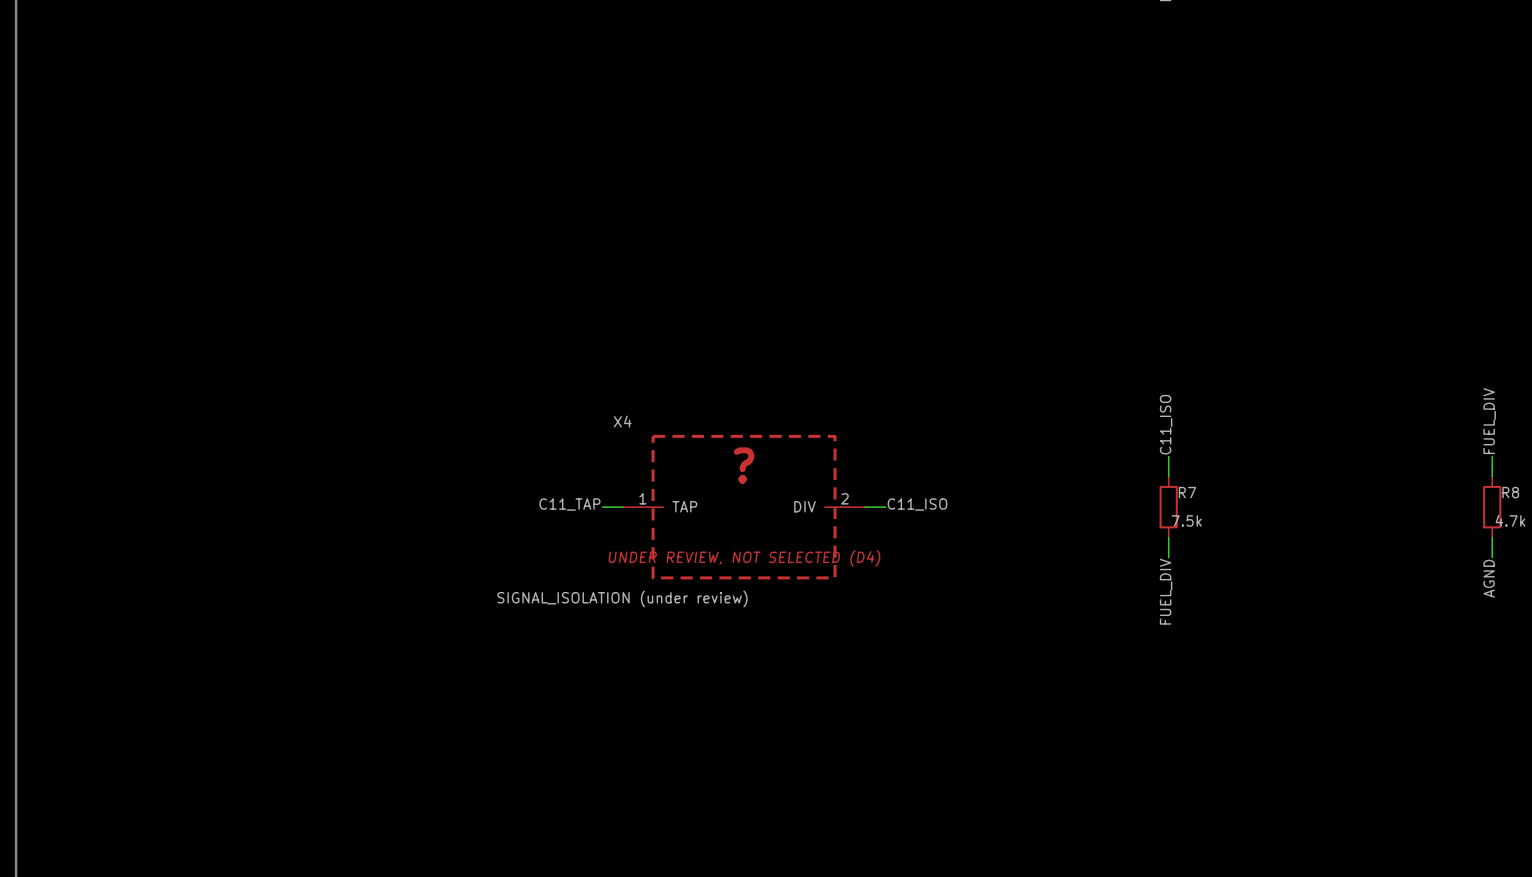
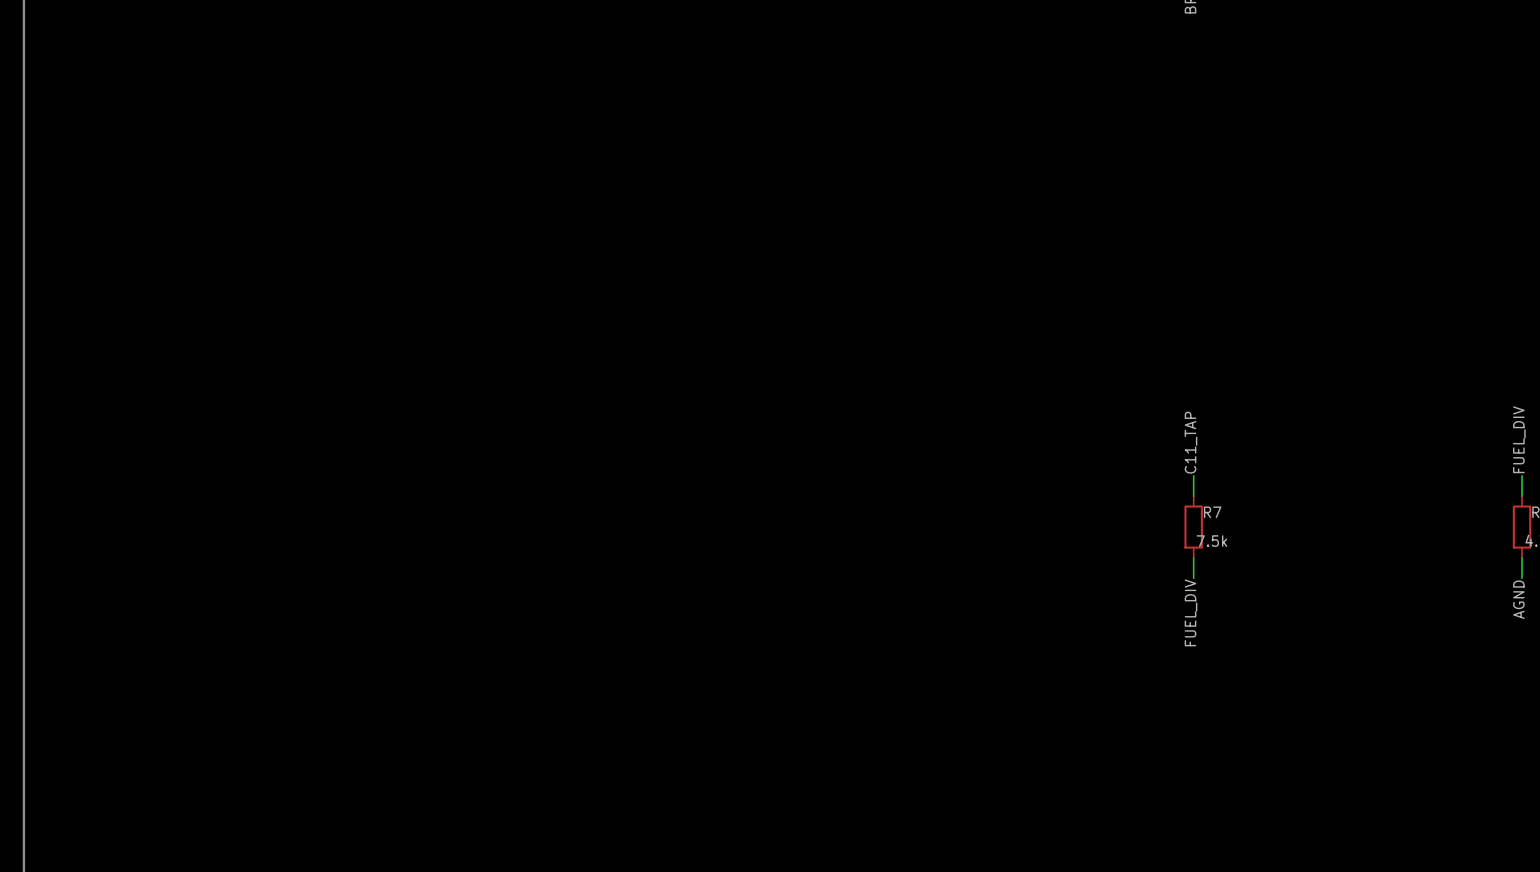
label: C11_ISO (1166, 424) -> C11_TAP (1191, 442)
label: C11_TAP (569, 504) -> none
label: C11_ISO (917, 504) -> none
wire: (602, 507) (622, 507) -> none
X4: SIGNAL_ISOLATION (under review) (744, 507) -> none
wire: (865, 507) (885, 507) -> none

